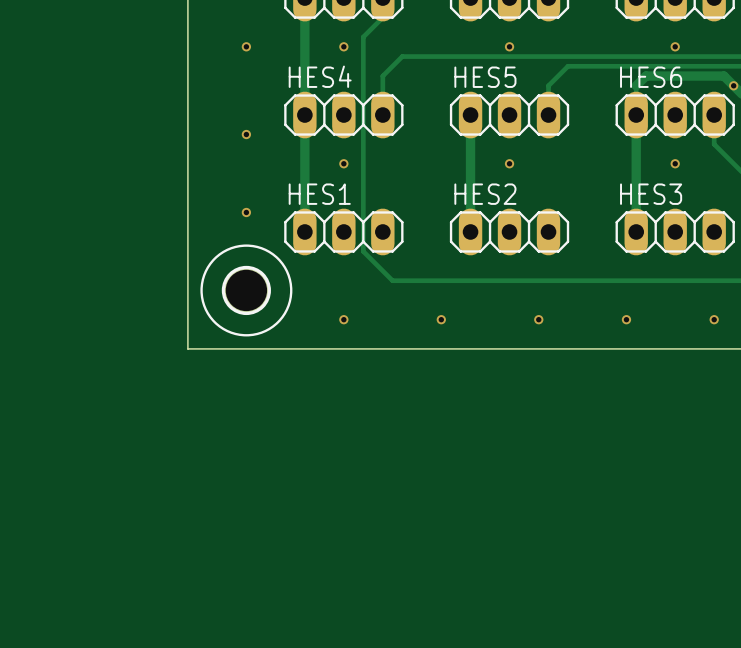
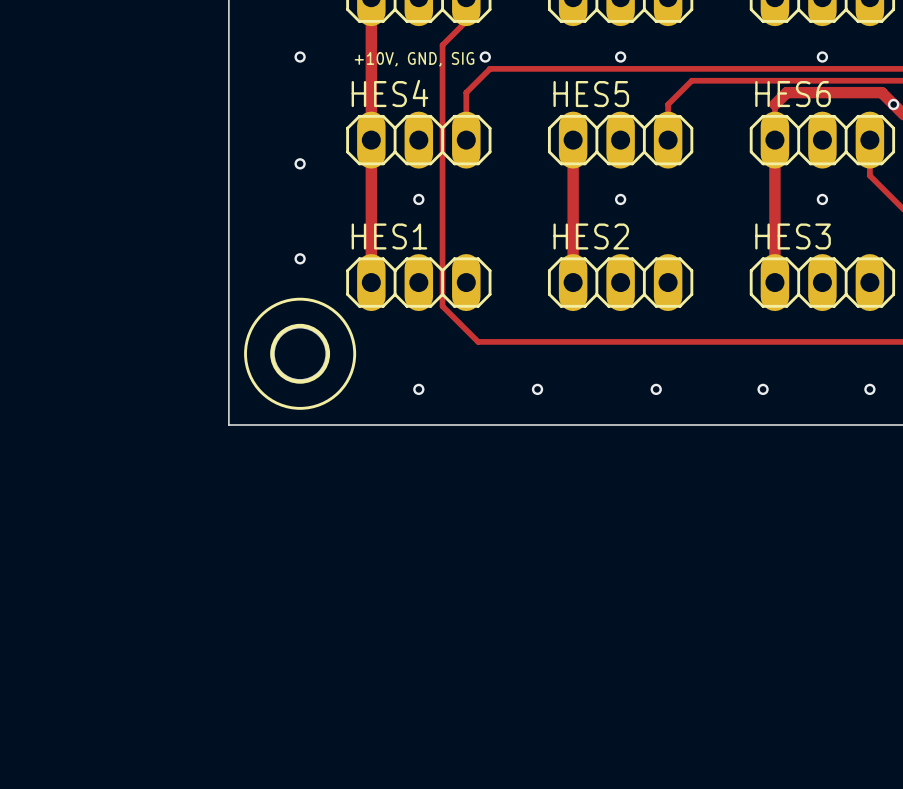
via position: (343, 46) -> (485, 57)
text: none -> +10V, GND, SIG (414, 59)

